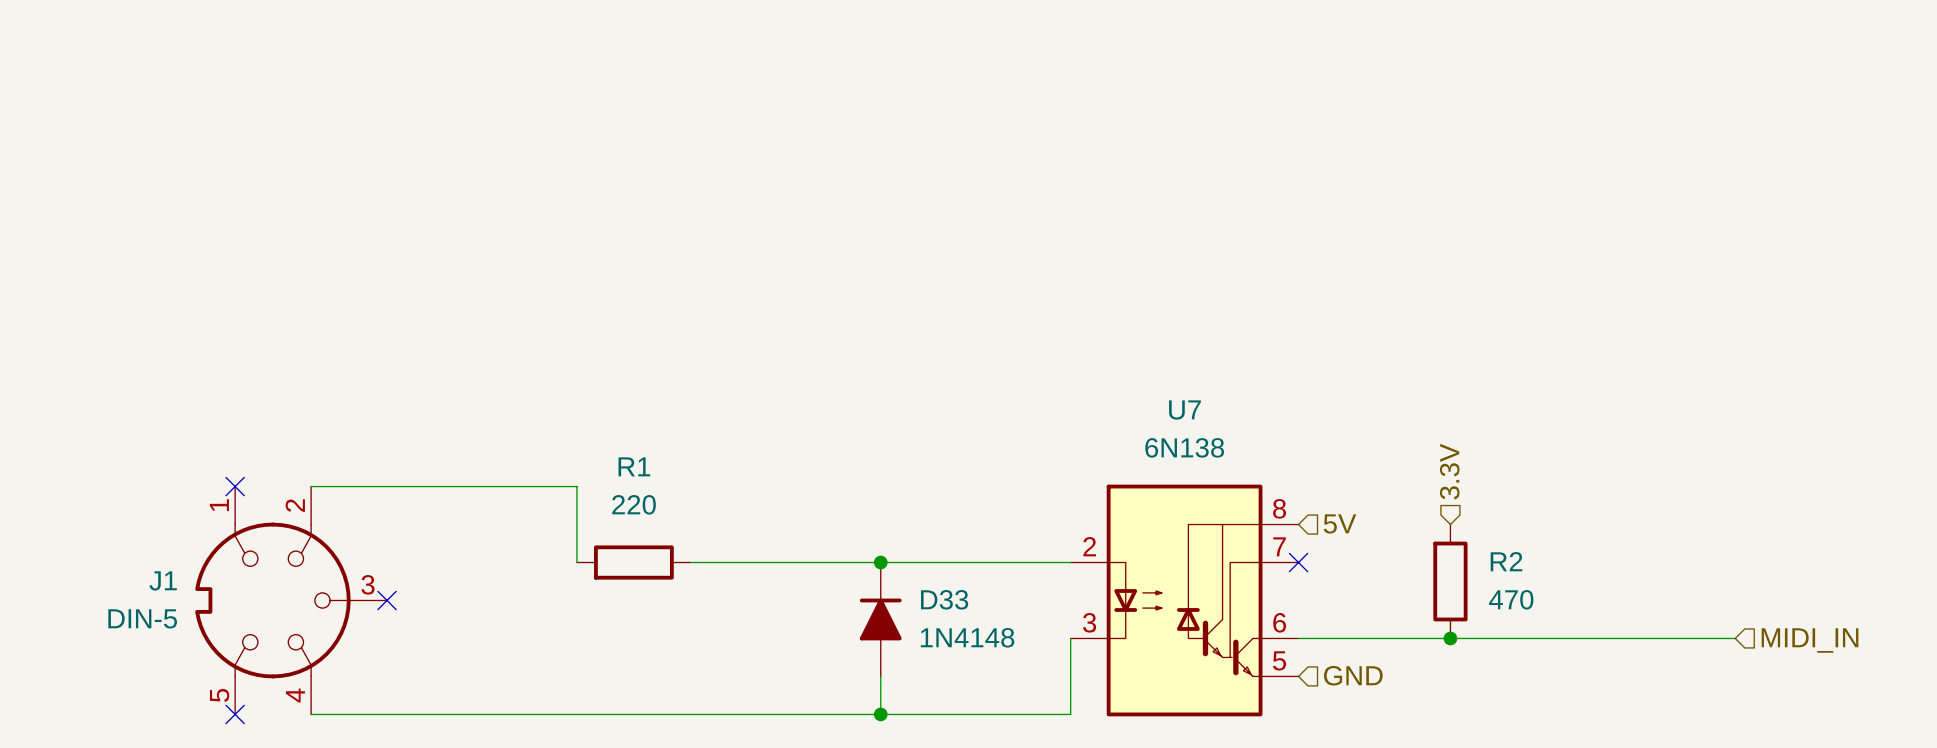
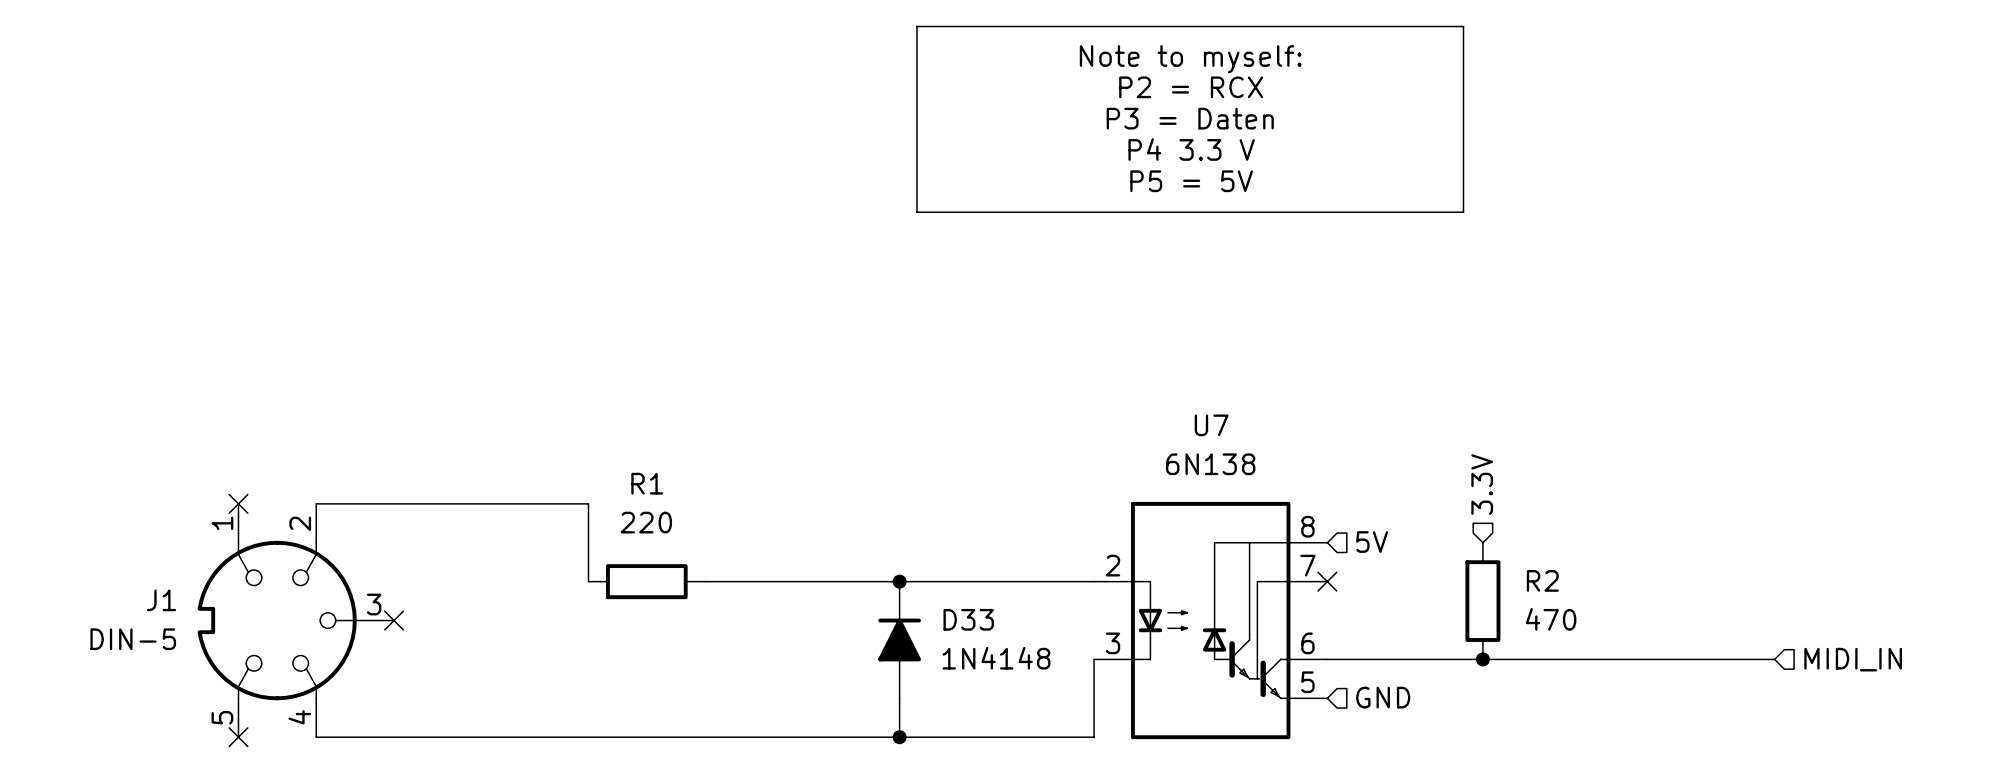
line: none -> (916, 26) (1463, 26) (1463, 212) (916, 212) (916, 26)
text: none -> Note to myself: (1190, 59)
text: none -> P2 = RCX (1191, 87)
text: none -> P3 = Daten (1190, 118)
text: none -> P4 3.3 V (1191, 149)
text: none -> P5 = 5V (1191, 181)

